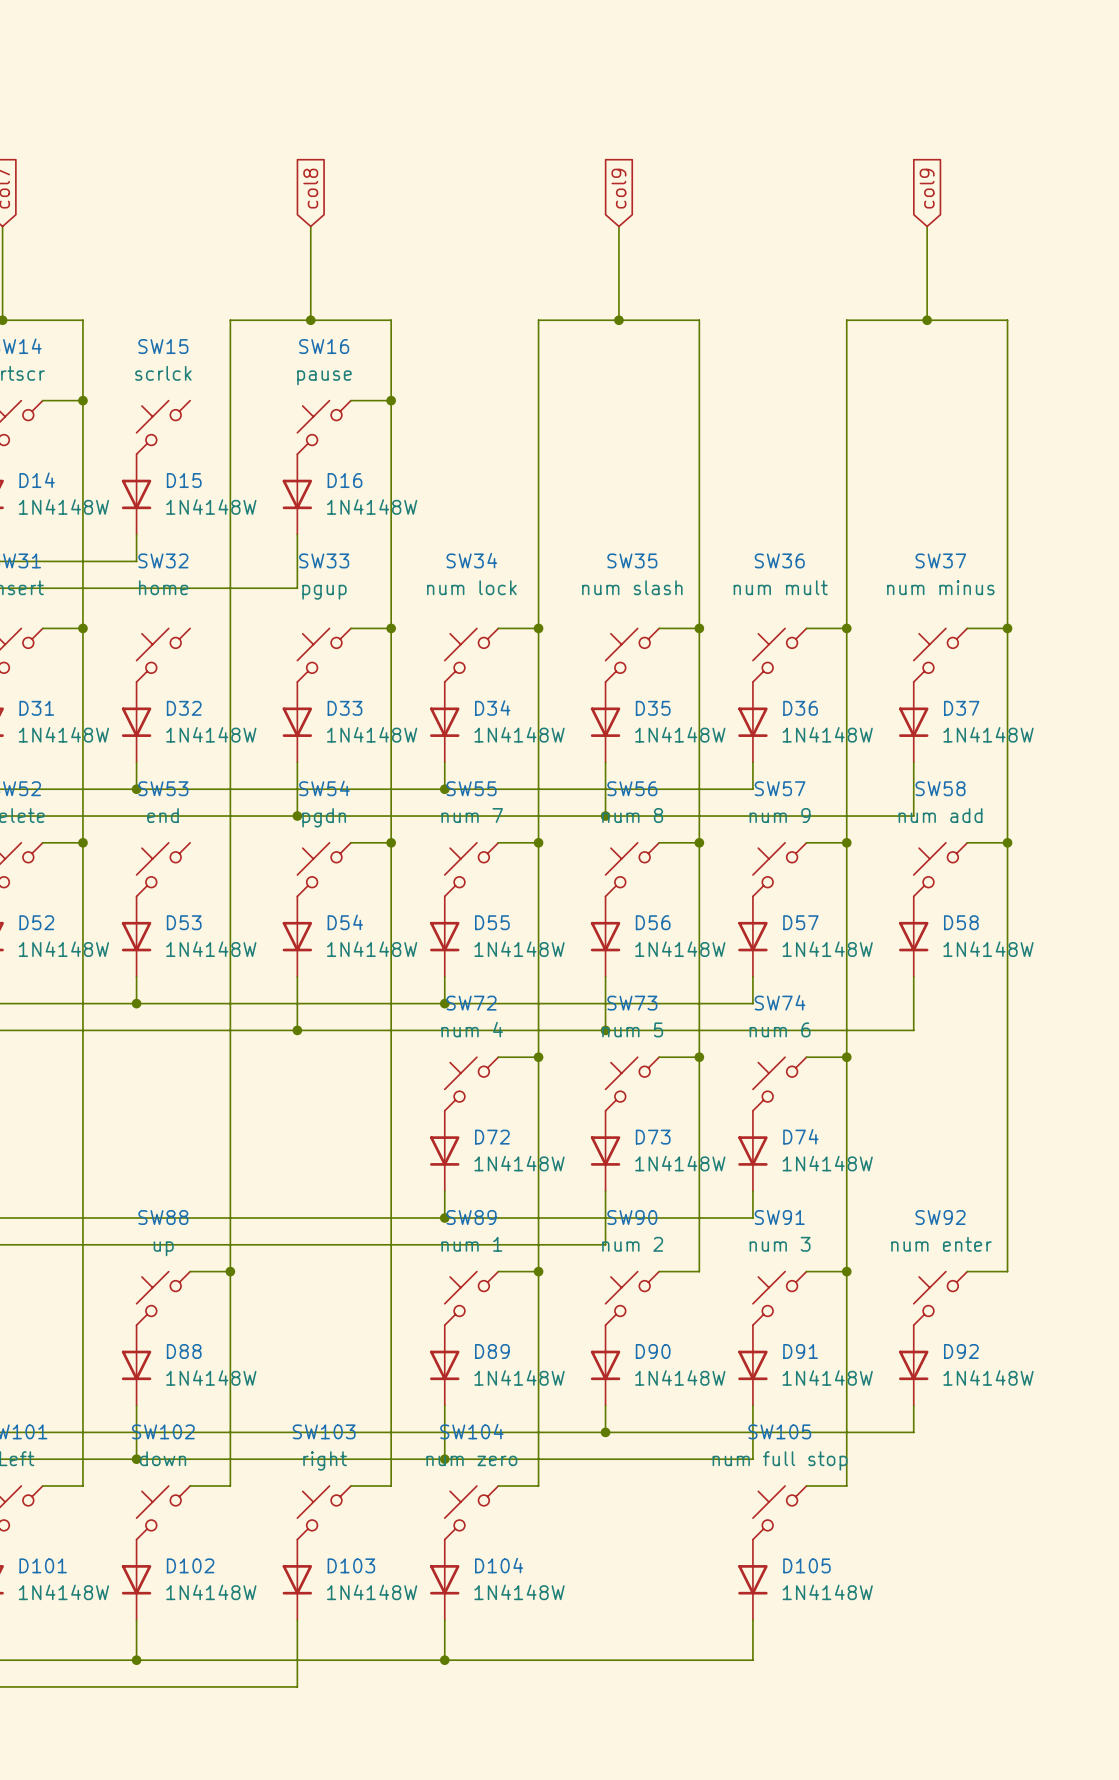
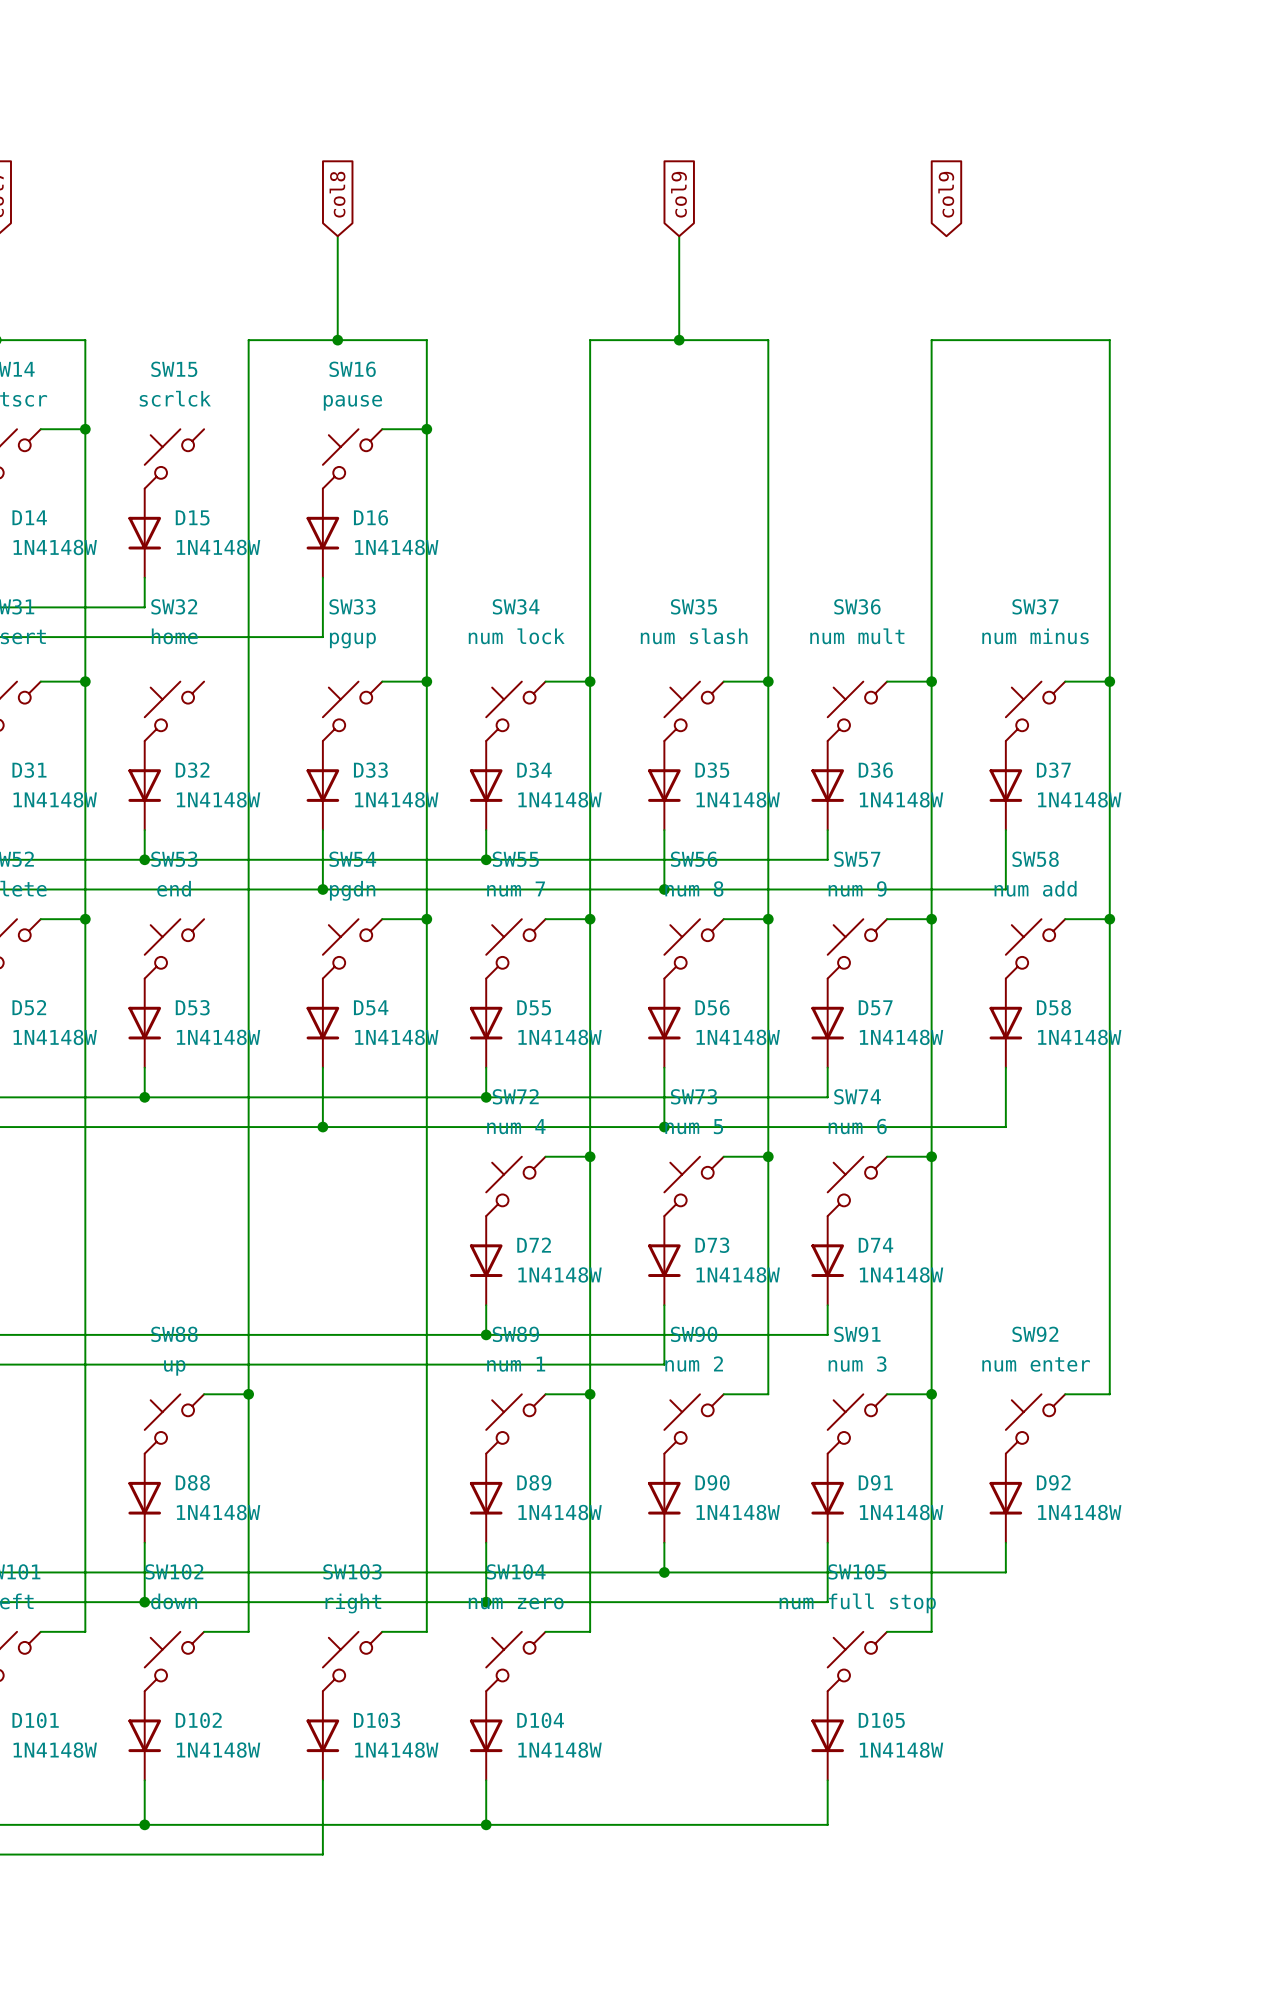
global label position: col9 (927, 188) -> col9 (946, 194)
wire: (927, 226) (927, 320) -> none
junction: (927, 320) -> none

